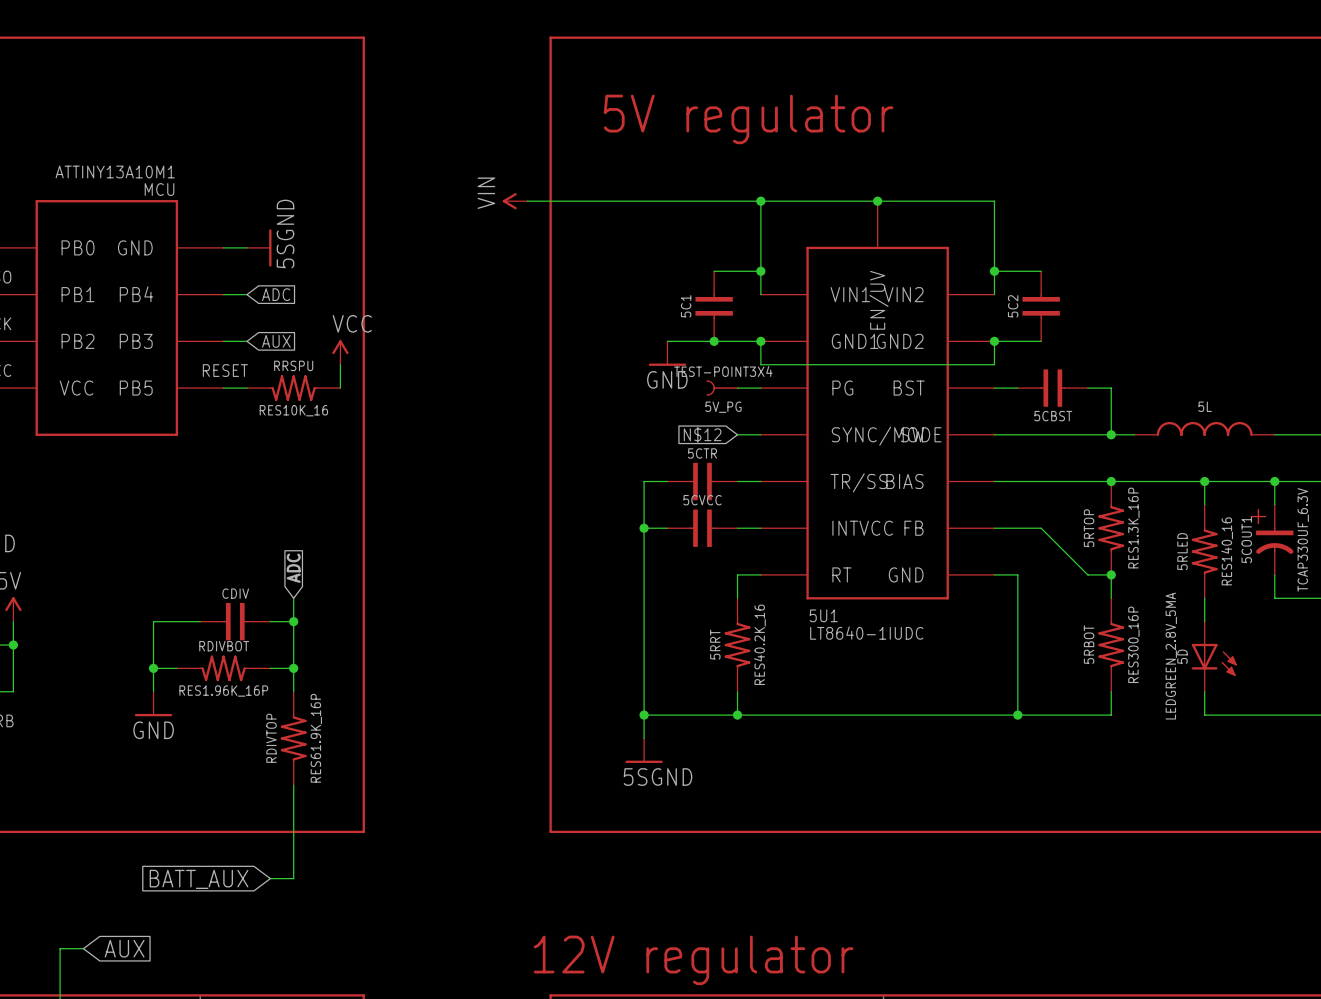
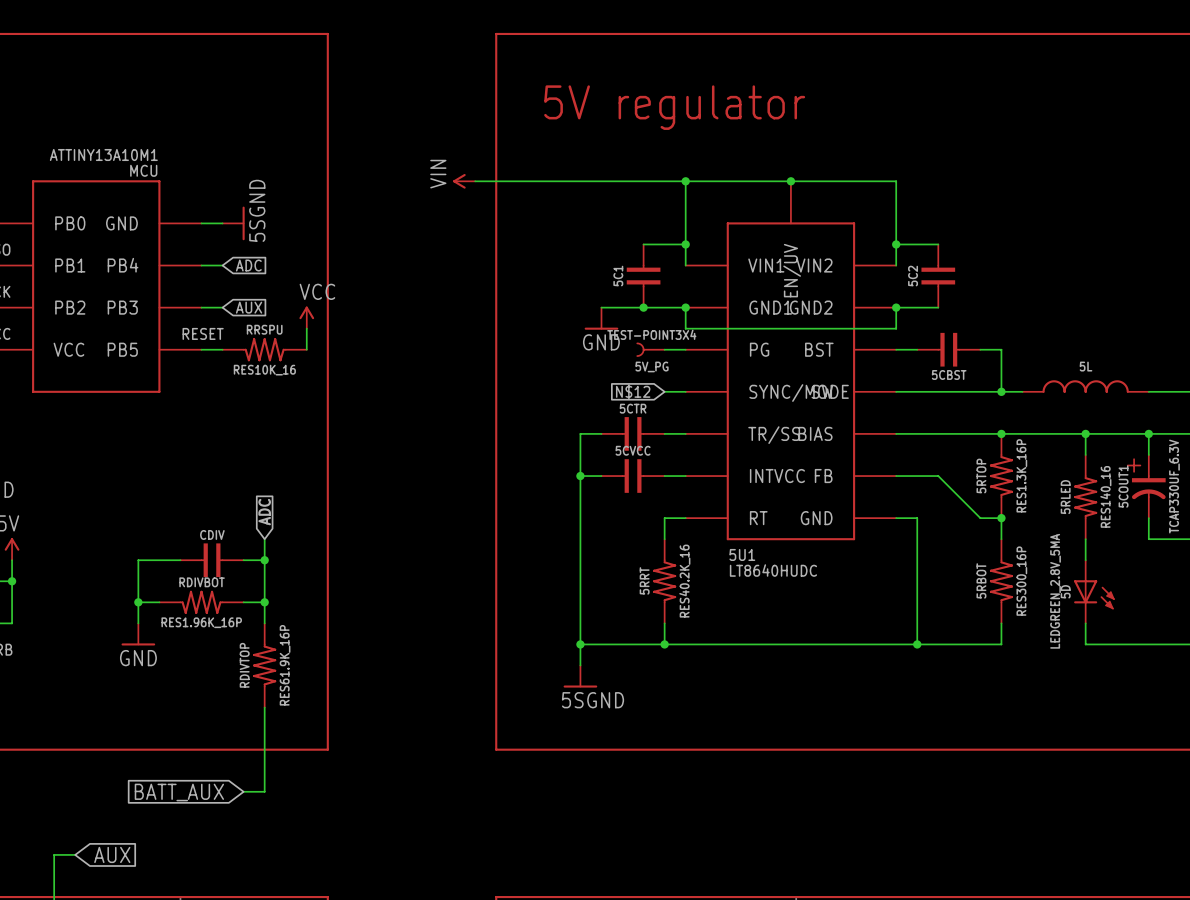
5U1 value: LT8640-1IUDC (866, 633) -> LT8640HUDC (773, 570)
text: 12V regulator (693, 960) -> none

